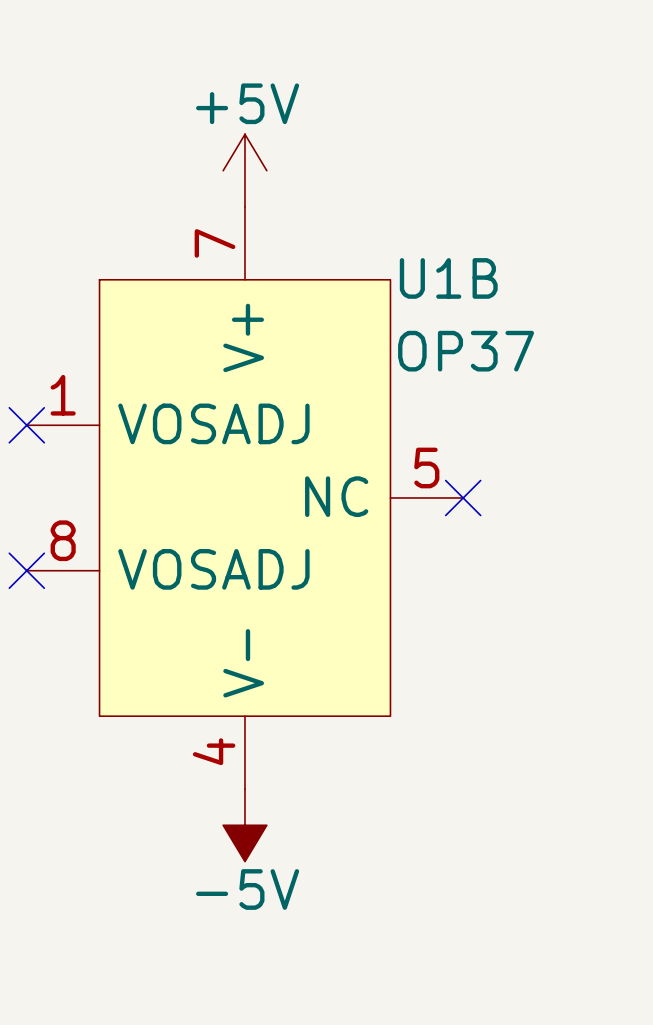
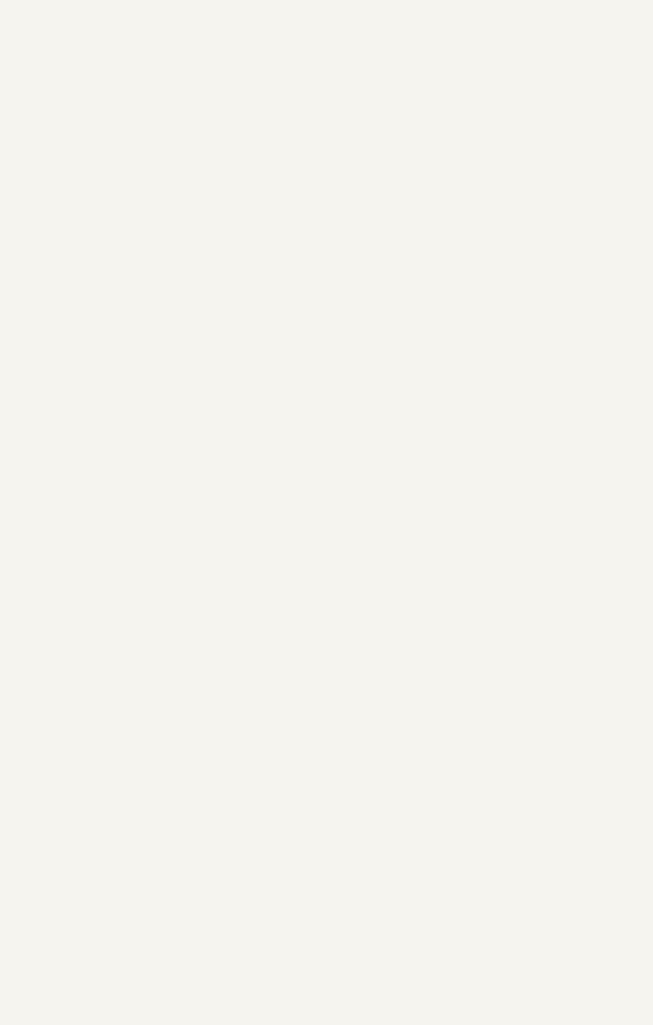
power symbol: +5V (244, 170) -> none
no-connect mark: (26, 425) -> none
U1B: OP37 (244, 497) -> none
no-connect mark: (463, 497) -> none
no-connect mark: (26, 570) -> none
power symbol: -5V (244, 825) -> none

